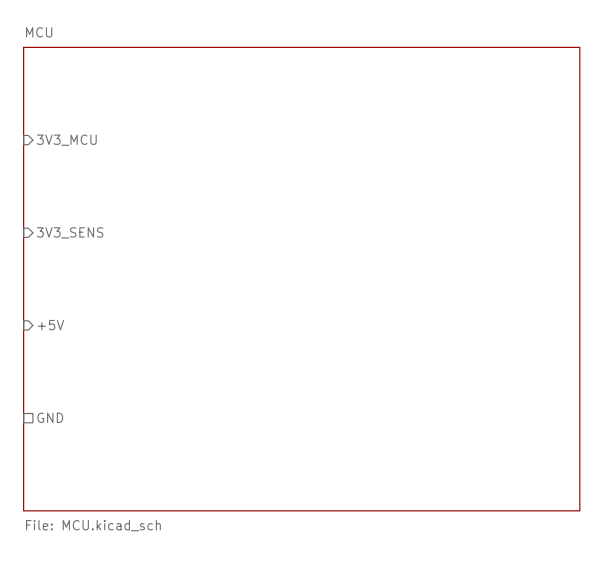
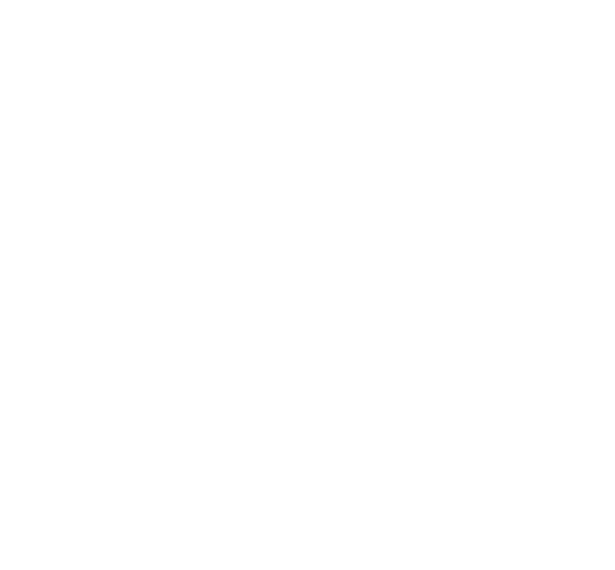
sheet pin: 3V3_MCU (66, 140) -> none
sheet pin: 3V3_SENS (70, 232) -> none
sheet MCU: File: MCU.kicad_sch (301, 279) -> none
sheet pin: +5V (50, 325) -> none
sheet pin: GND (50, 417) -> none

